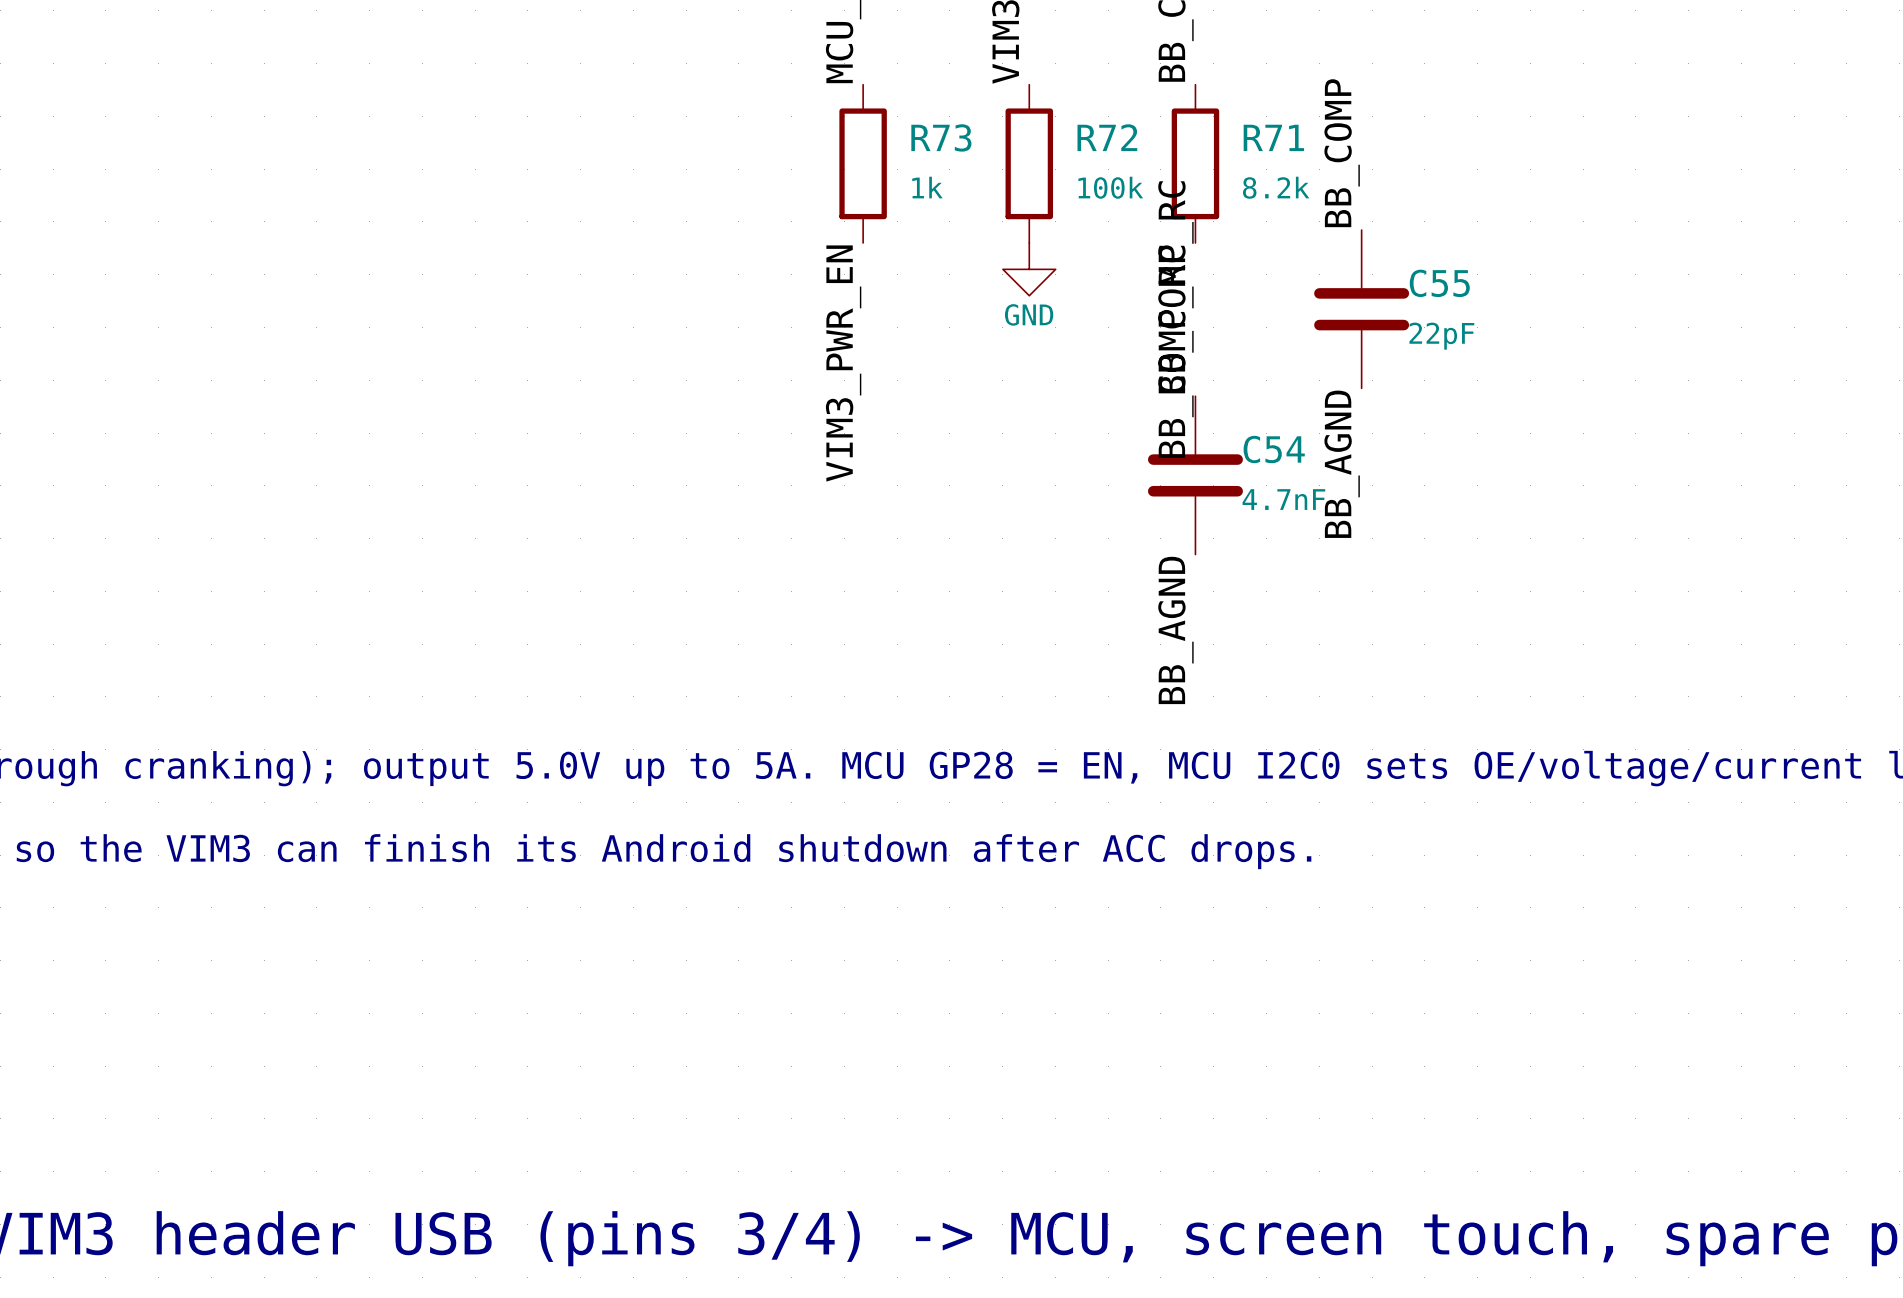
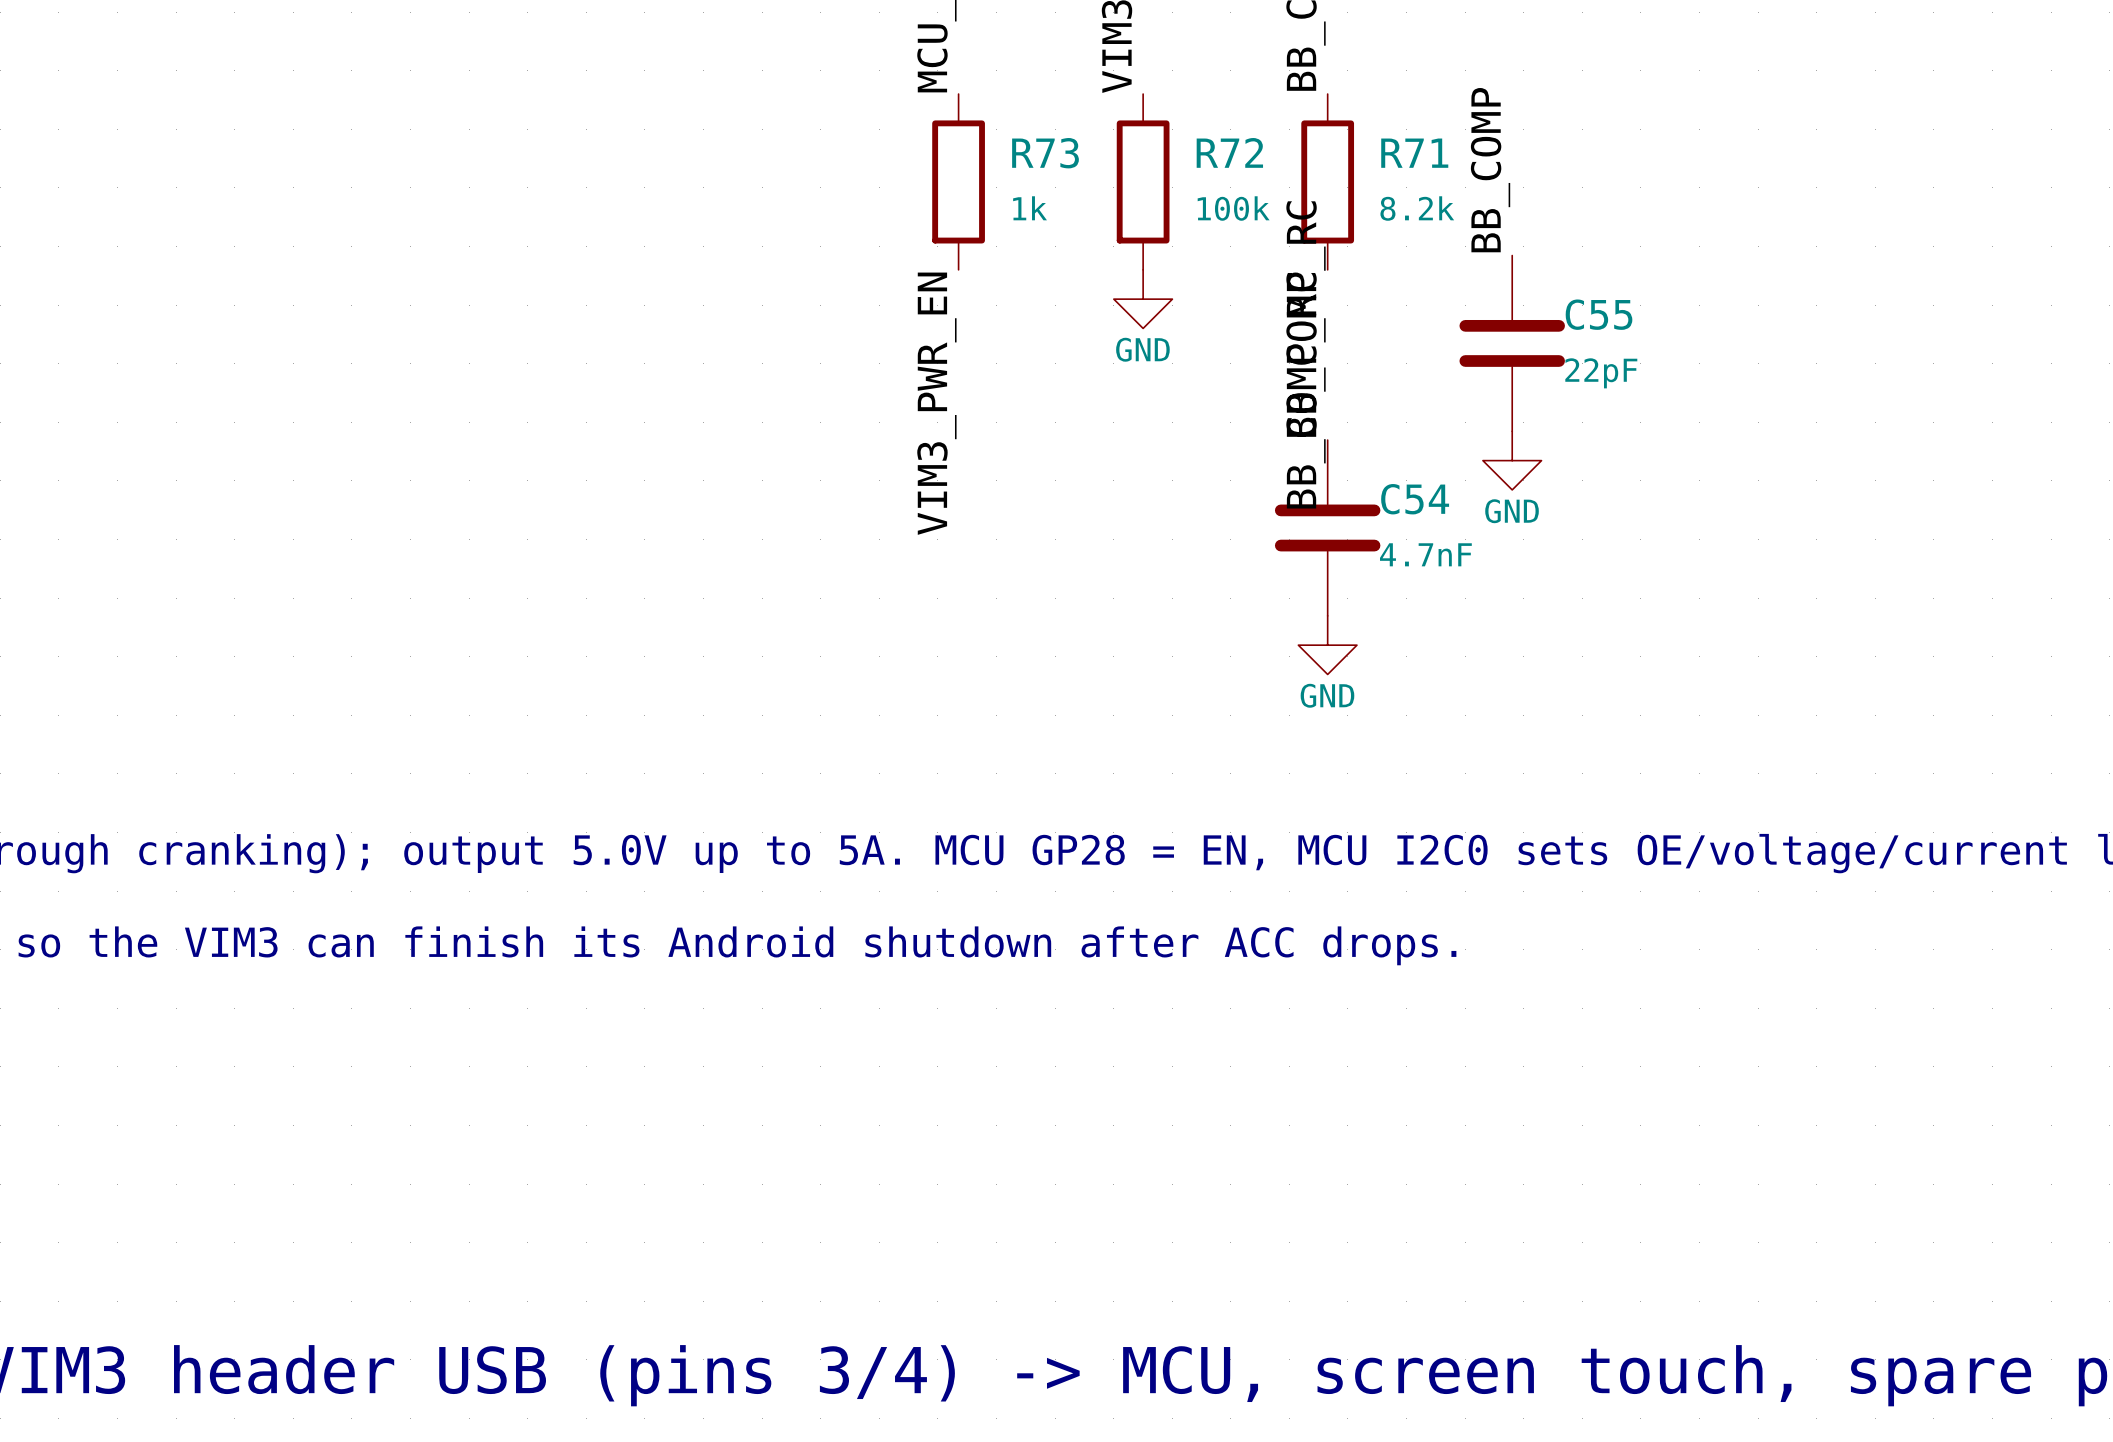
power symbol: none -> GND (1512, 460)
label: BB_AGND (1342, 464) -> none
power symbol: none -> GND (1327, 645)
label: BB_AGND (1175, 630) -> none

